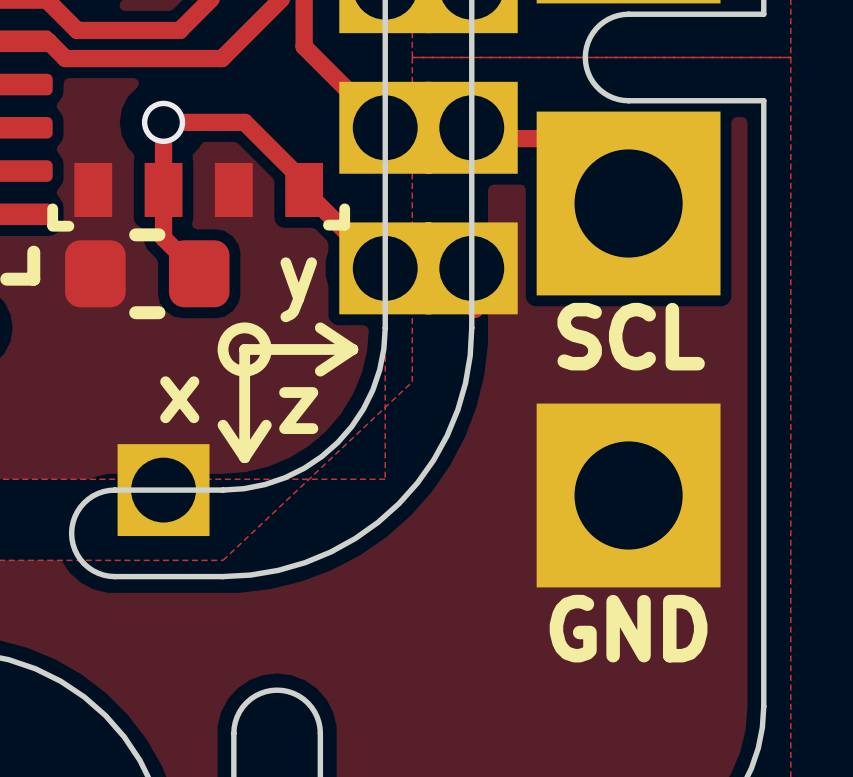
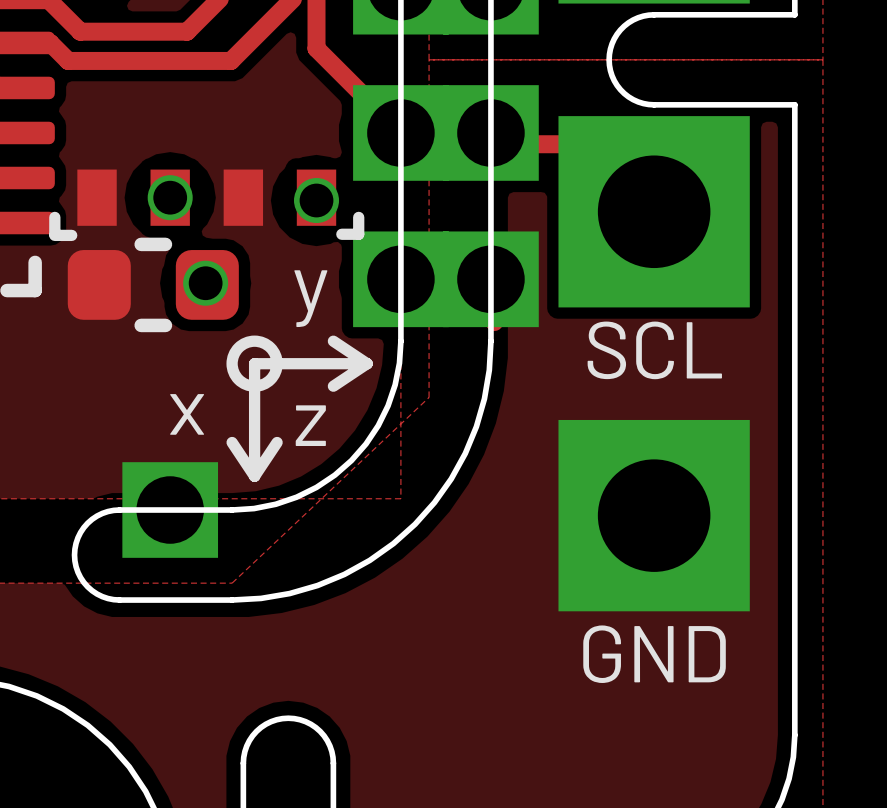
via position: (163, 122) -> (170, 197)
via: none -> (316, 200)
track: (360, 268) (360, 246) (304, 189) (304, 181) (244, 122) (163, 122) (163, 238) (197, 272) -> none
via: none -> (205, 283)

